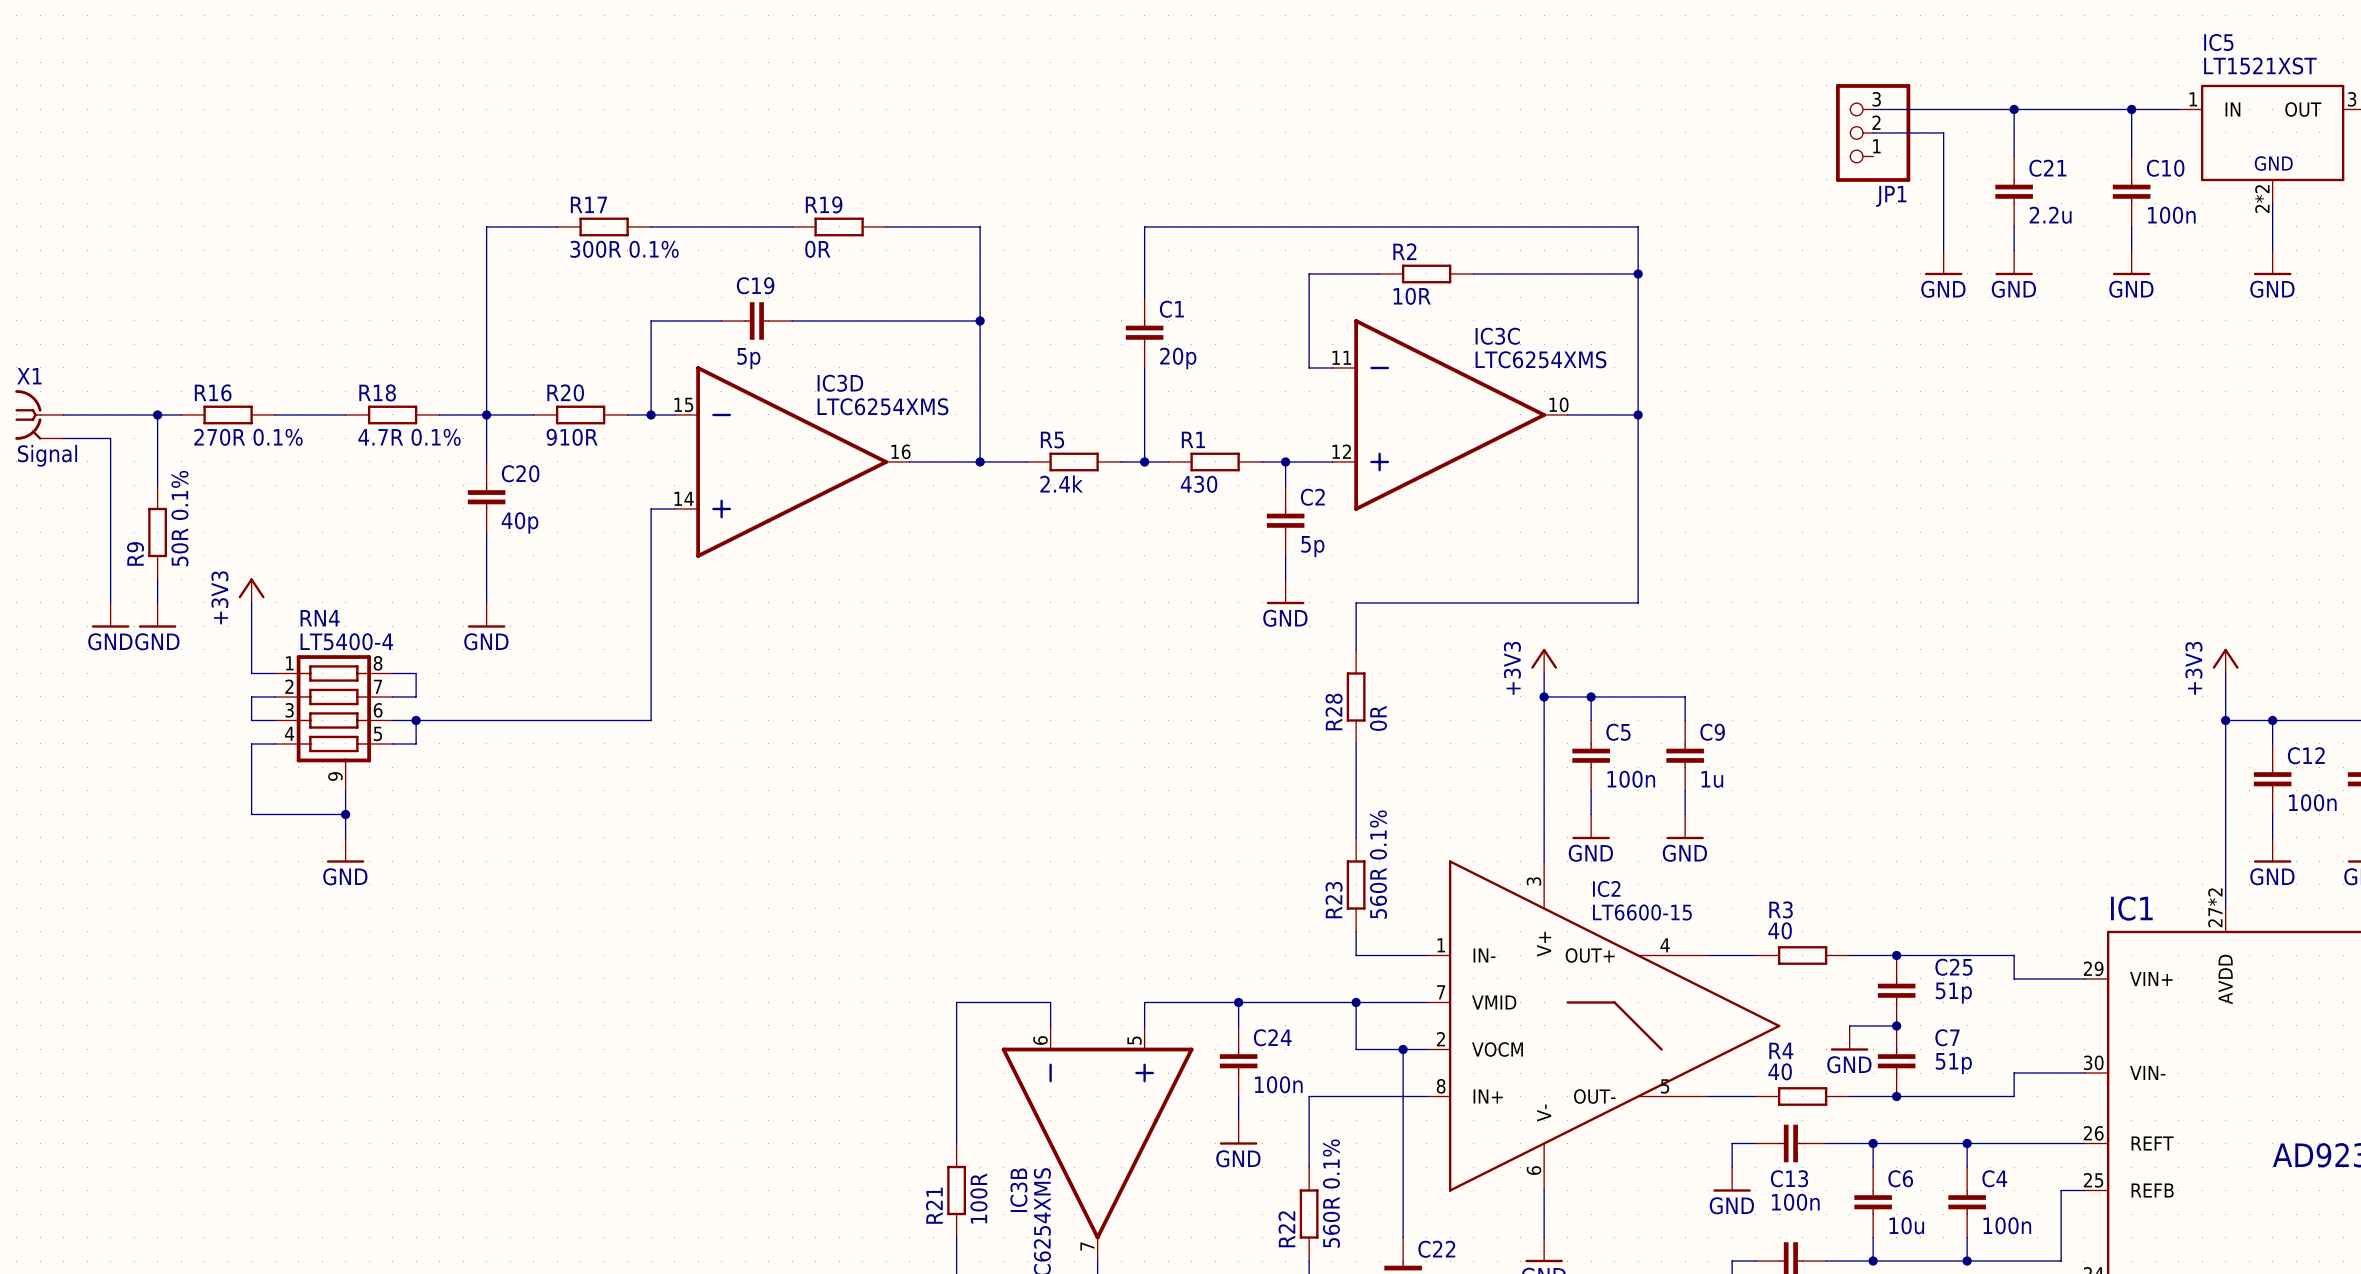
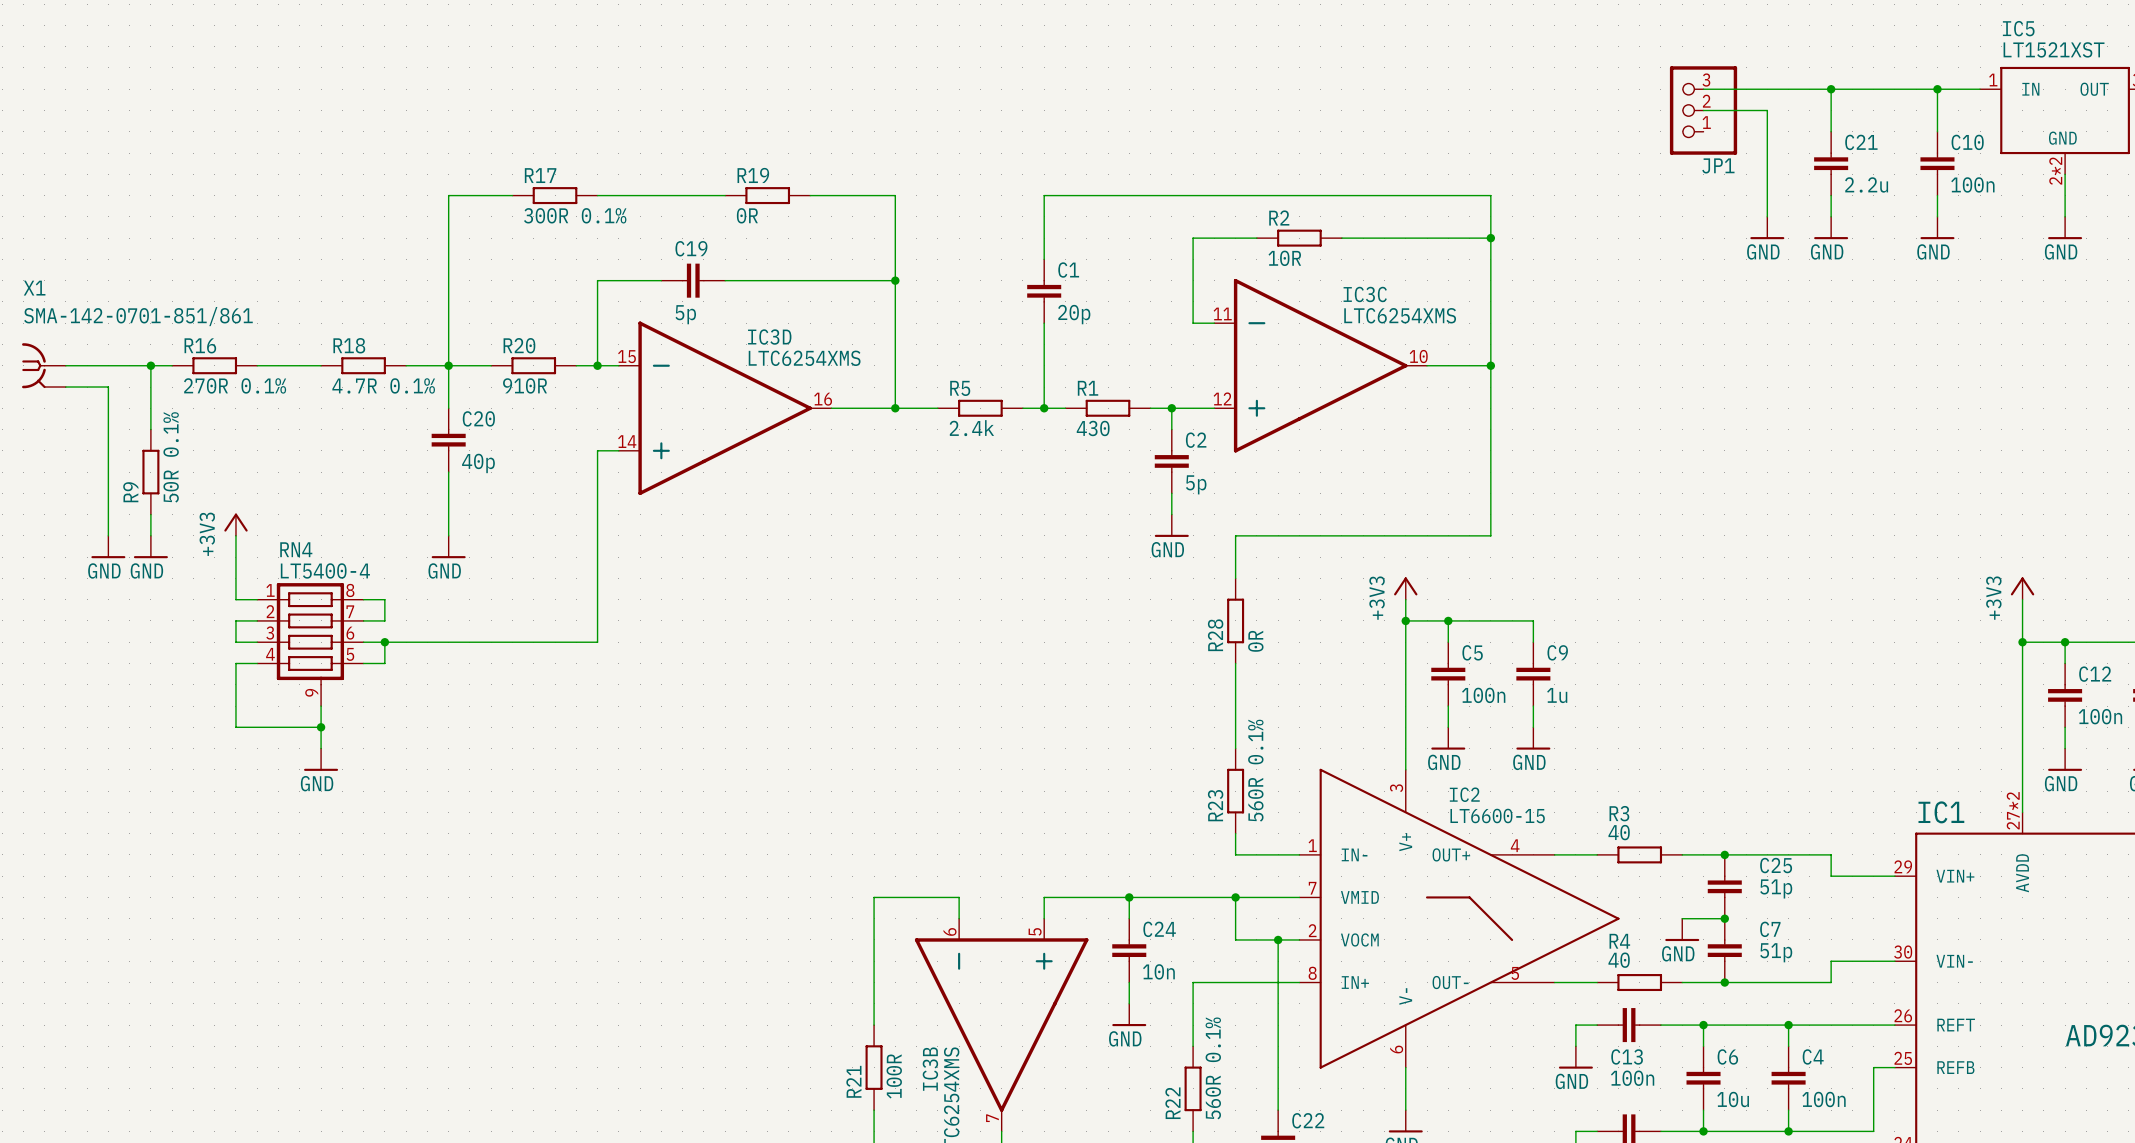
X1 name position: X1 (29, 376) -> X1 (34, 288)
X1 value: Signal (47, 455) -> SMA-142-0701-851/861 (138, 316)
C24 value: 100n (1278, 1084) -> 10n (1158, 971)

